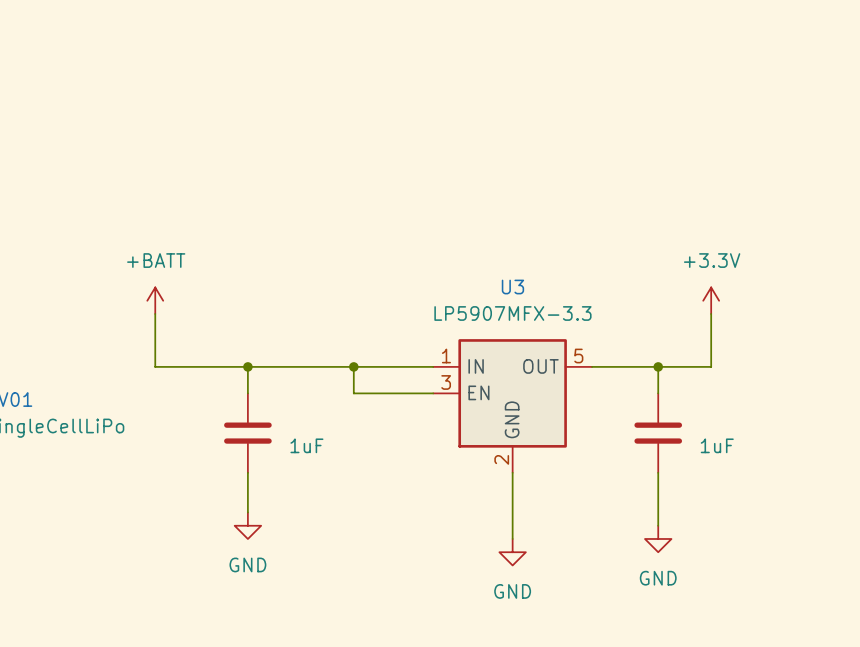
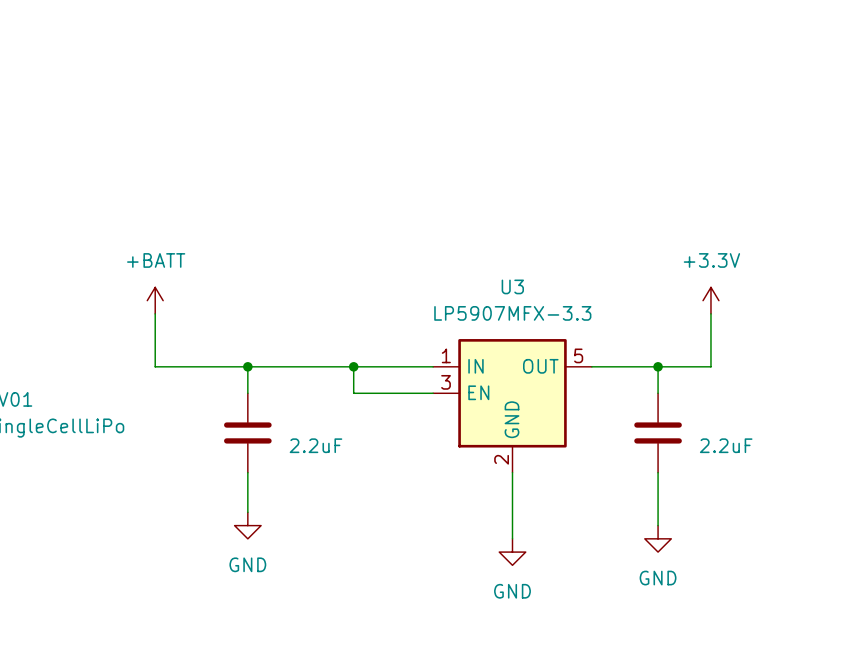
part value: 1uF (306, 445) -> 2.2uF (316, 445)
part value: 1uF (717, 445) -> 2.2uF (726, 445)

